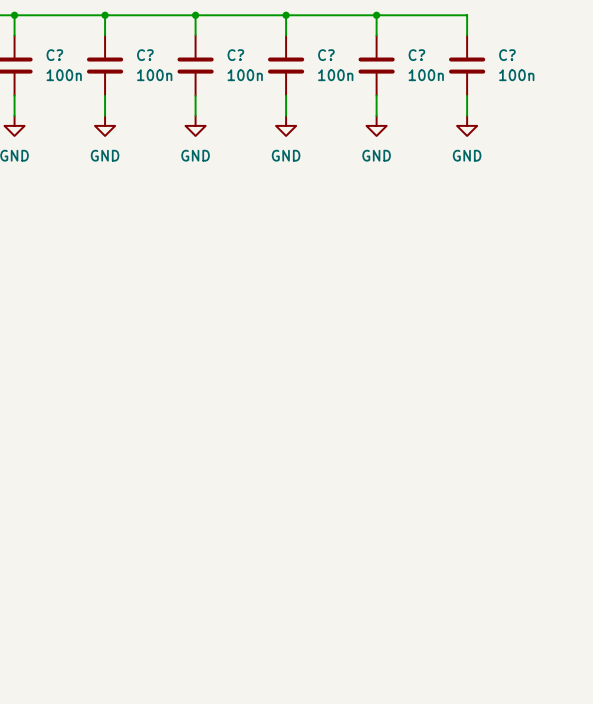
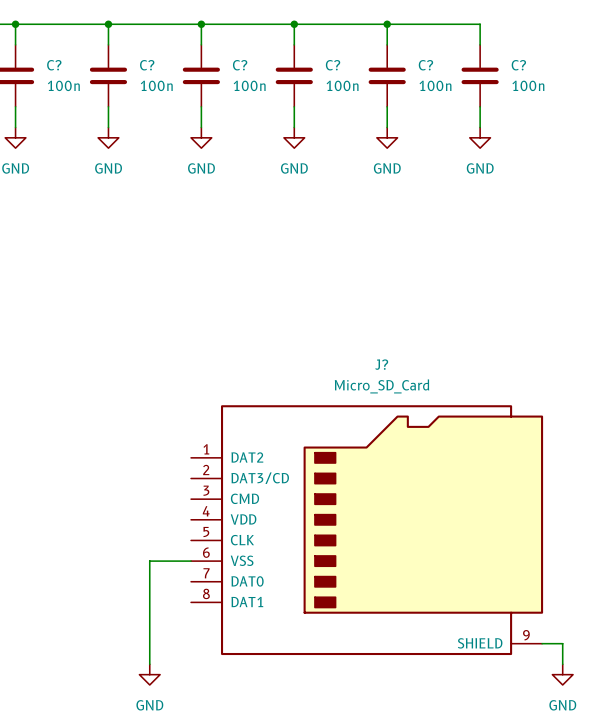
J?: none -> Micro_SD_Card (367, 530)
wire: none -> (191, 561) (149, 561) (149, 664)
wire: none -> (542, 643) (562, 643) (562, 664)
power symbol: none -> GND (149, 674)
power symbol: none -> GND (562, 674)

